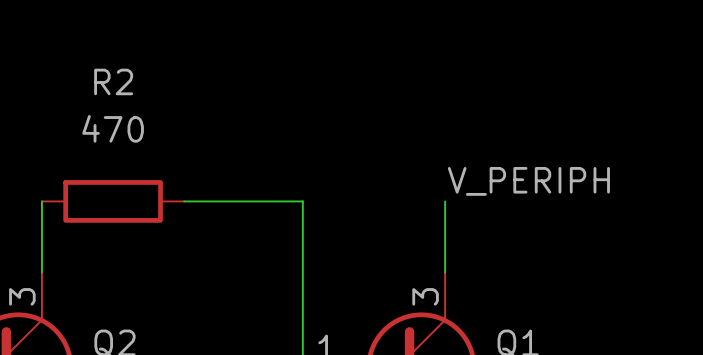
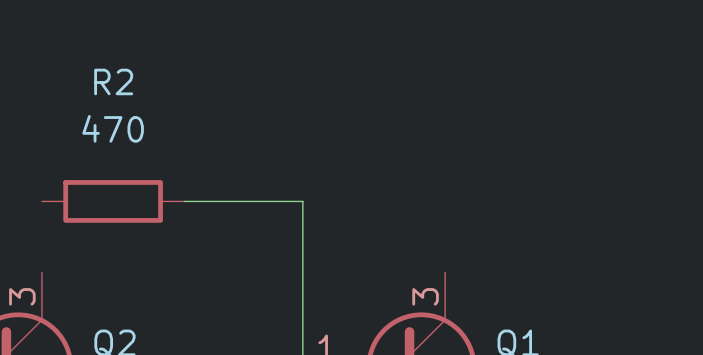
label: V_PERIPH (528, 181) -> none
wire: (41, 201) (41, 272) -> none
wire: (445, 201) (445, 272) -> none

